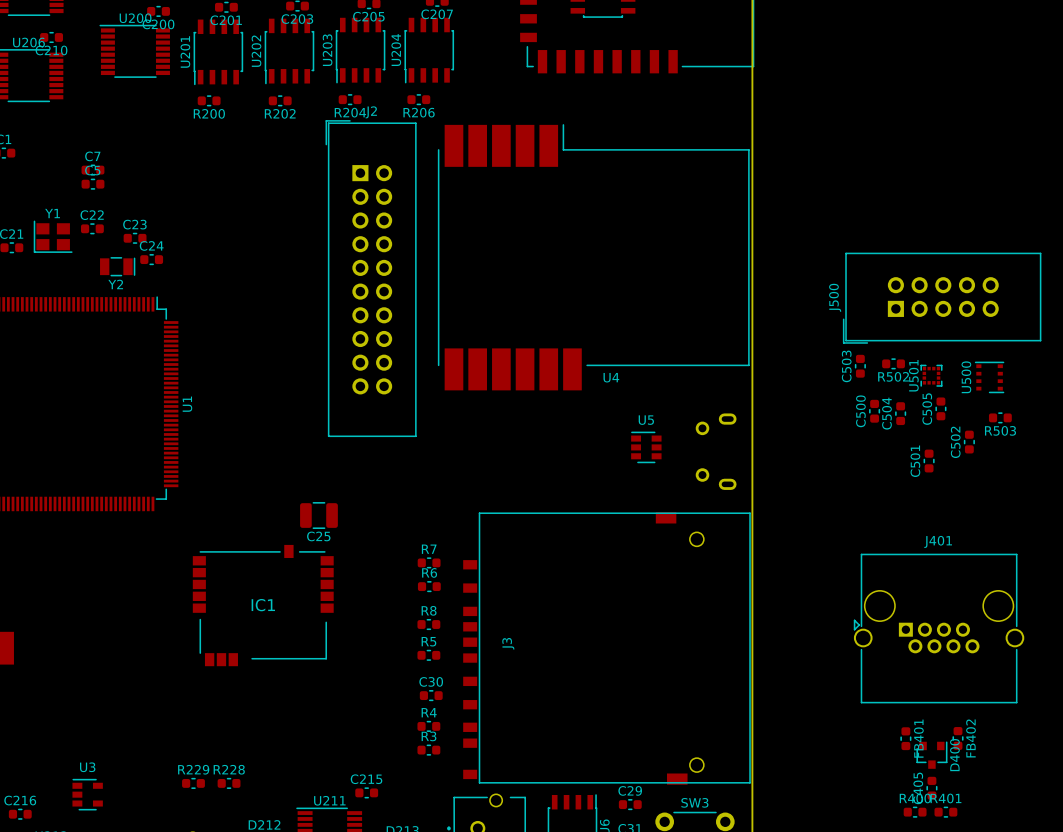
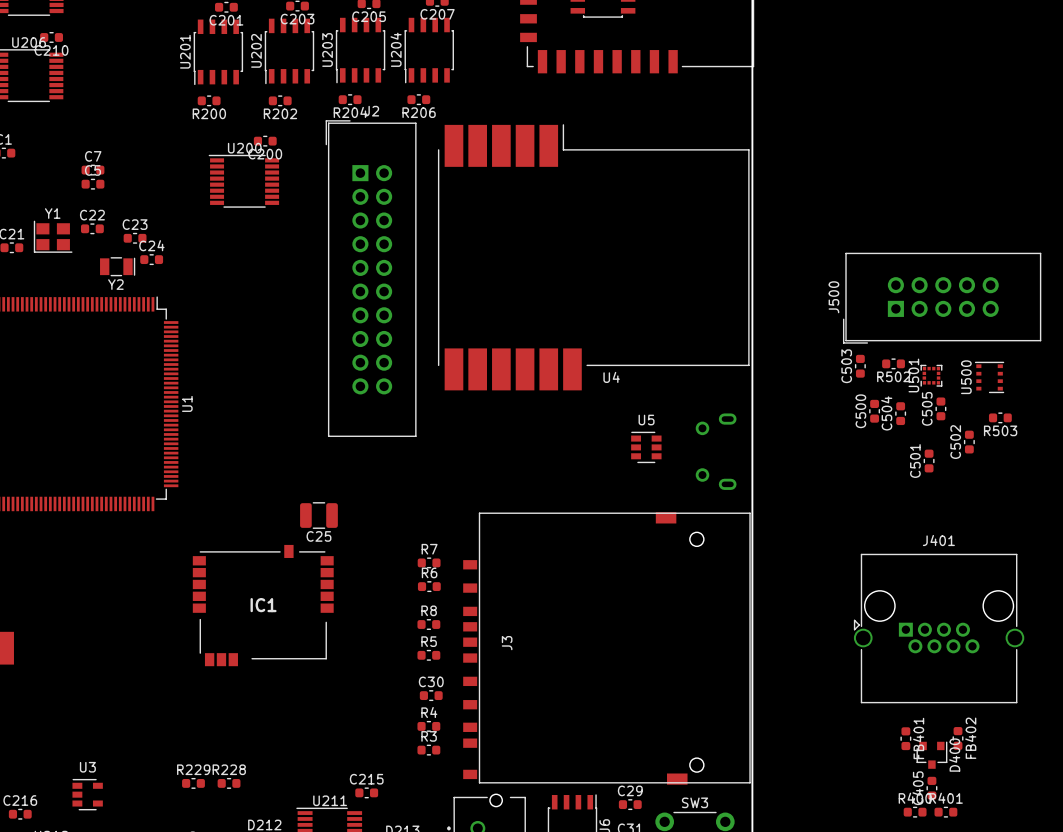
C200 position: (158, 11) -> (265, 141)
U200 position: (134, 51) -> (243, 181)

